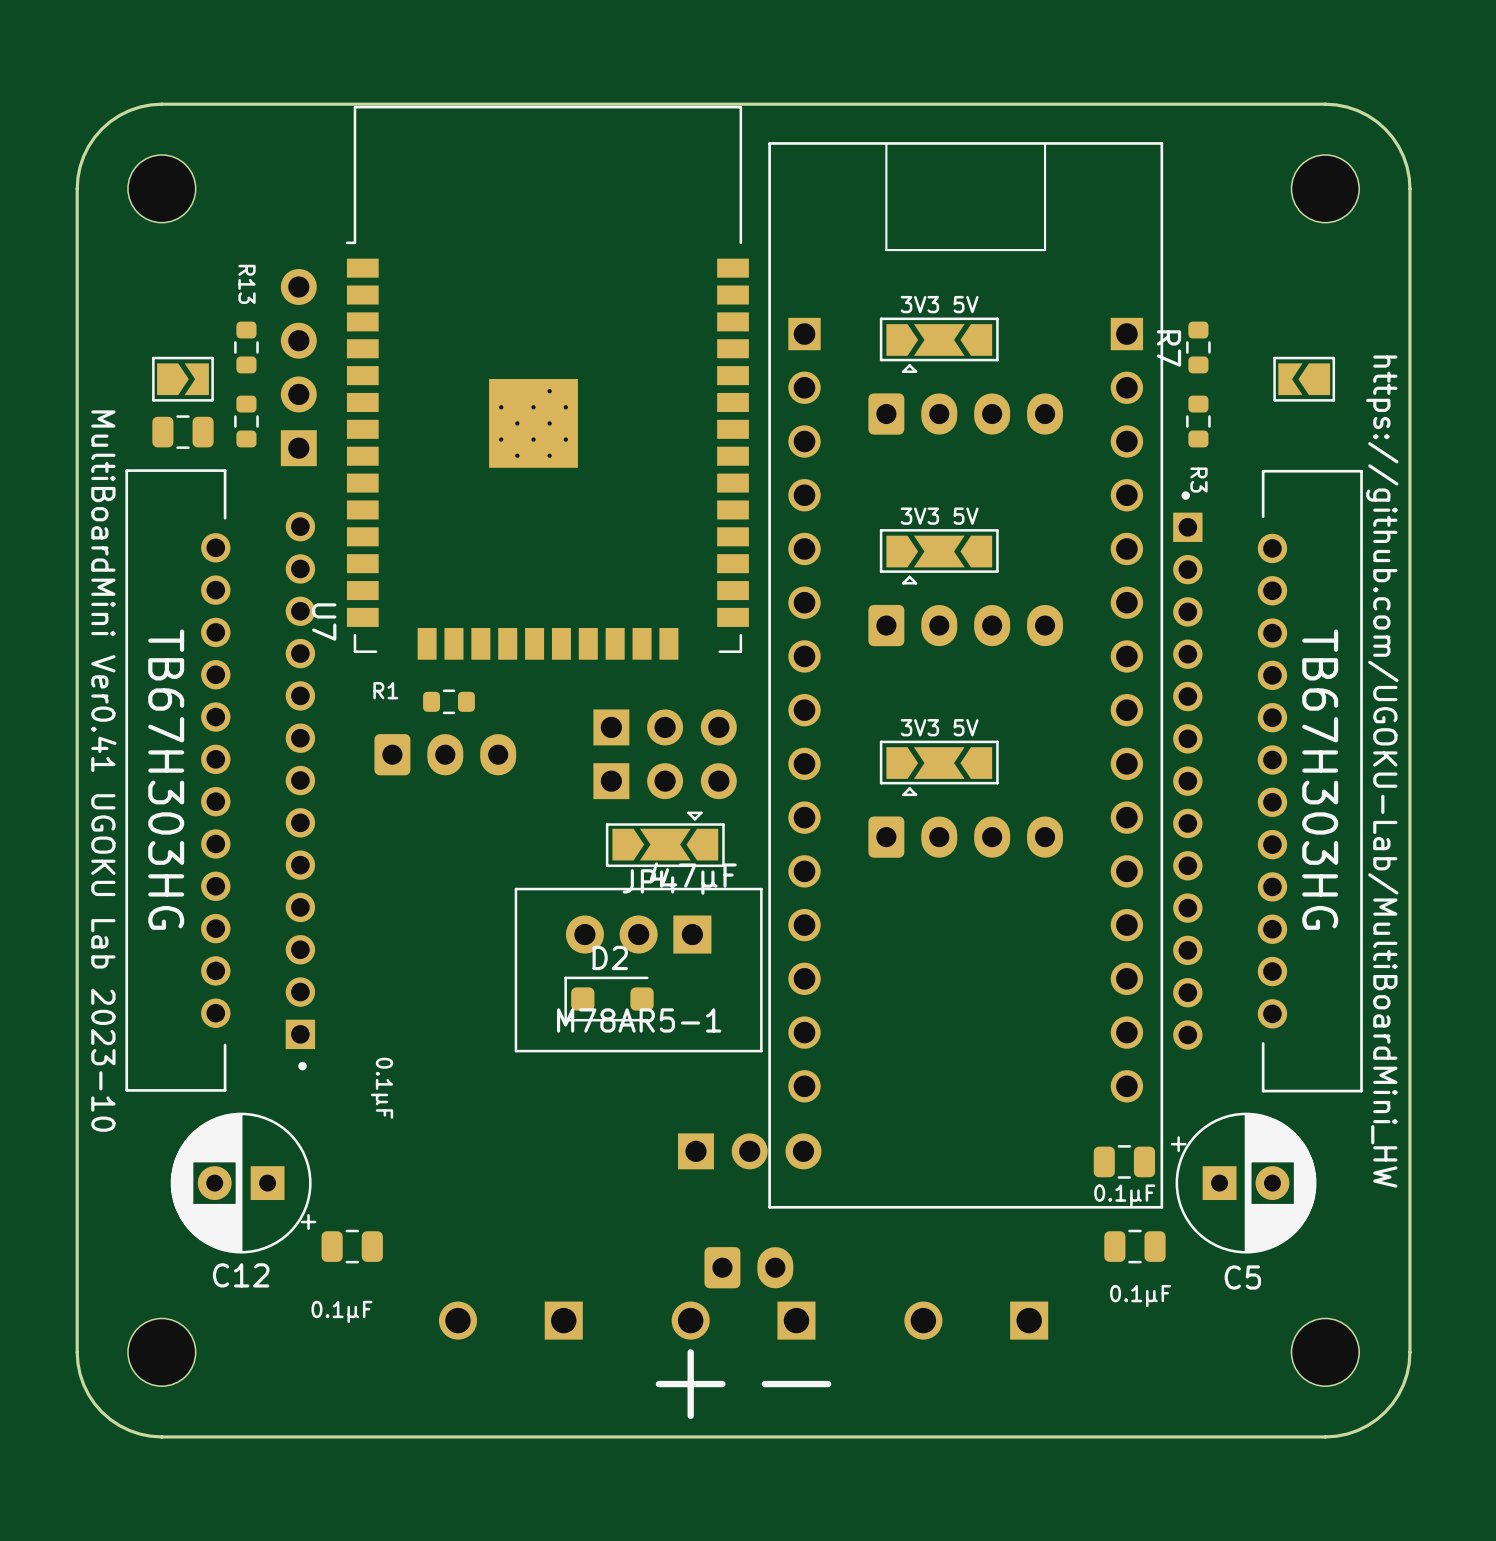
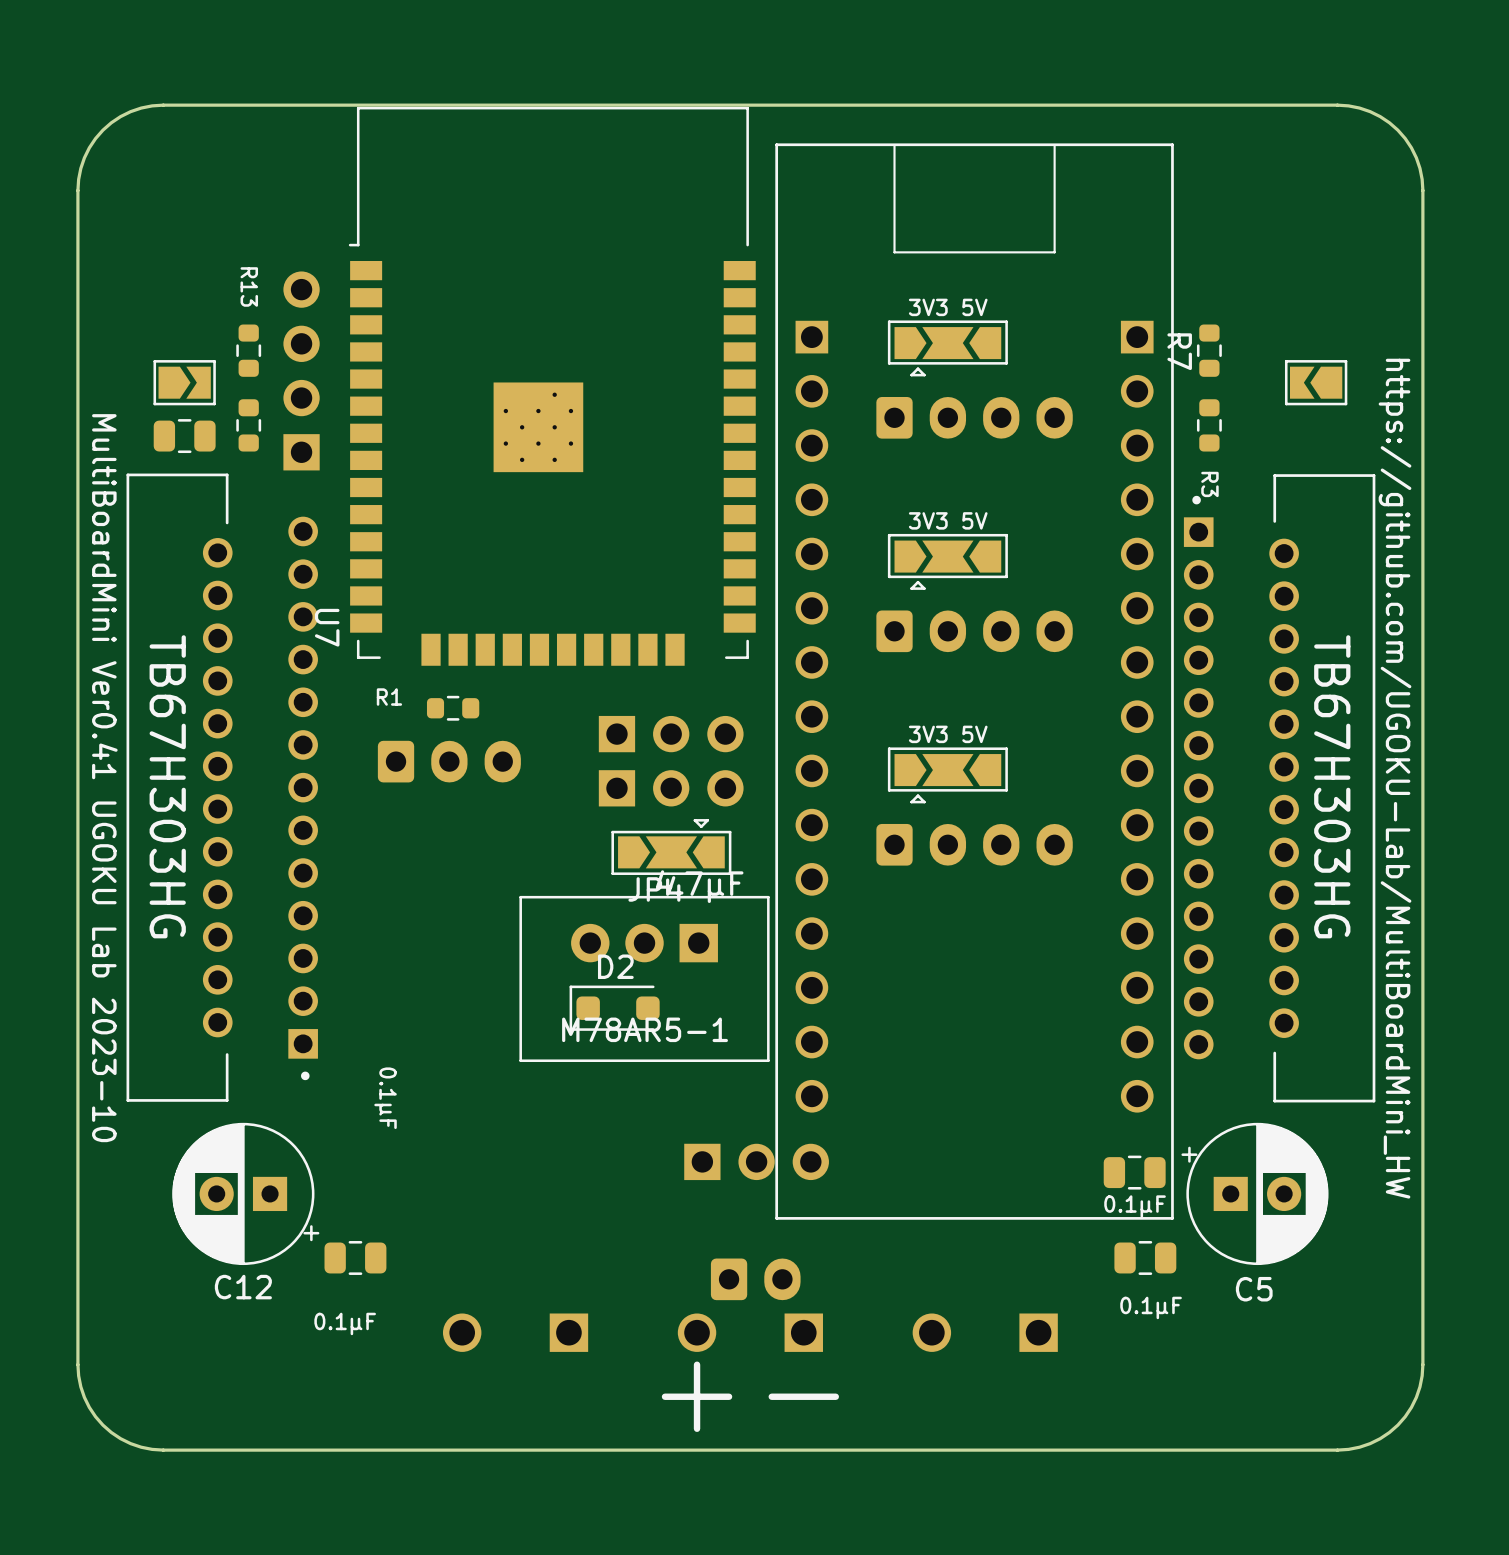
part: (161, 188) -> none
part: (1325, 188) -> none
part: (161, 1352) -> none
part: (1325, 1352) -> none

